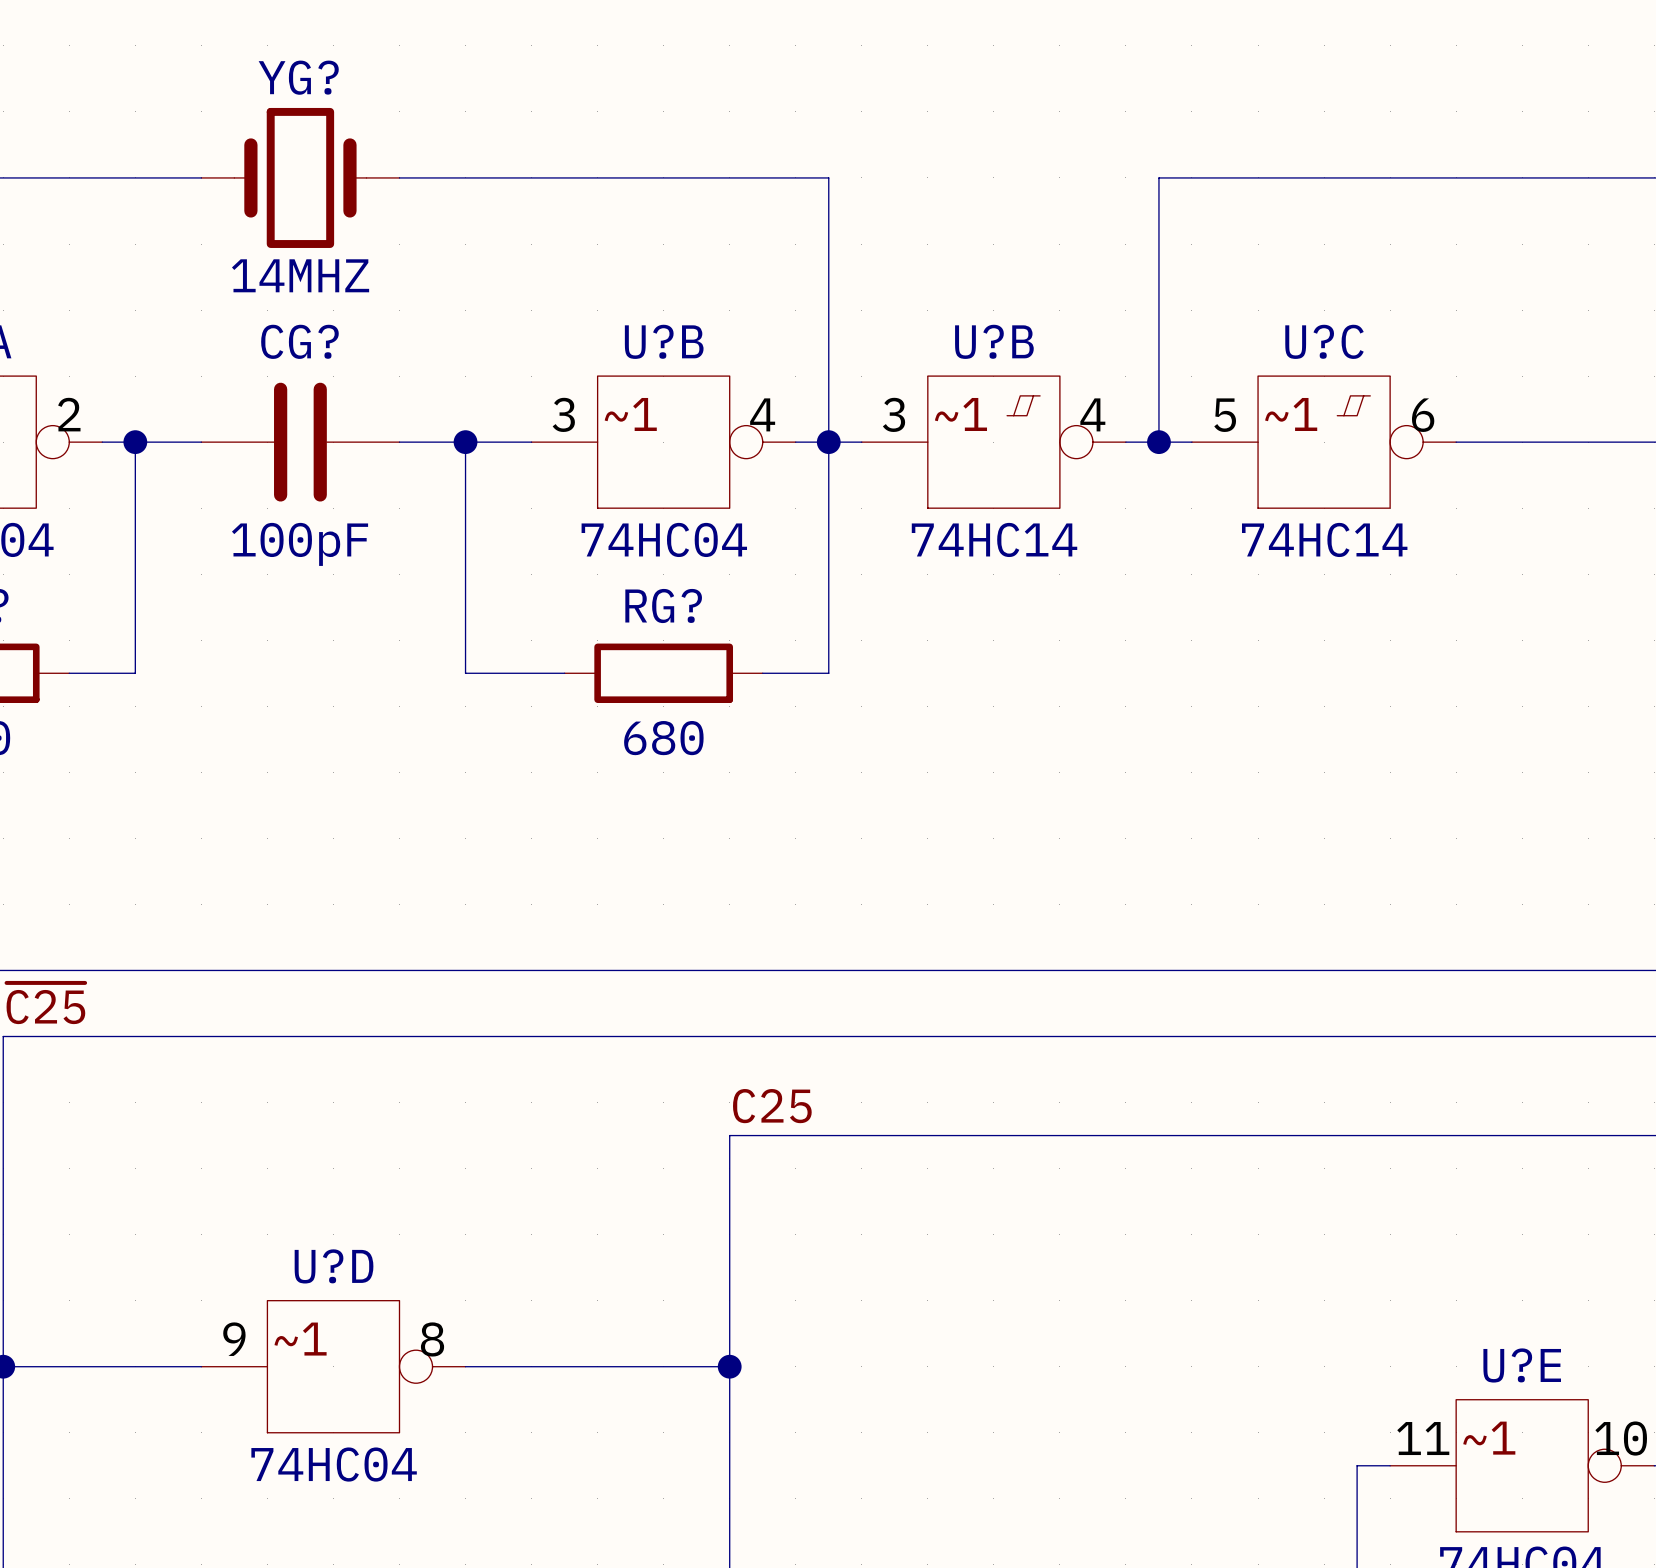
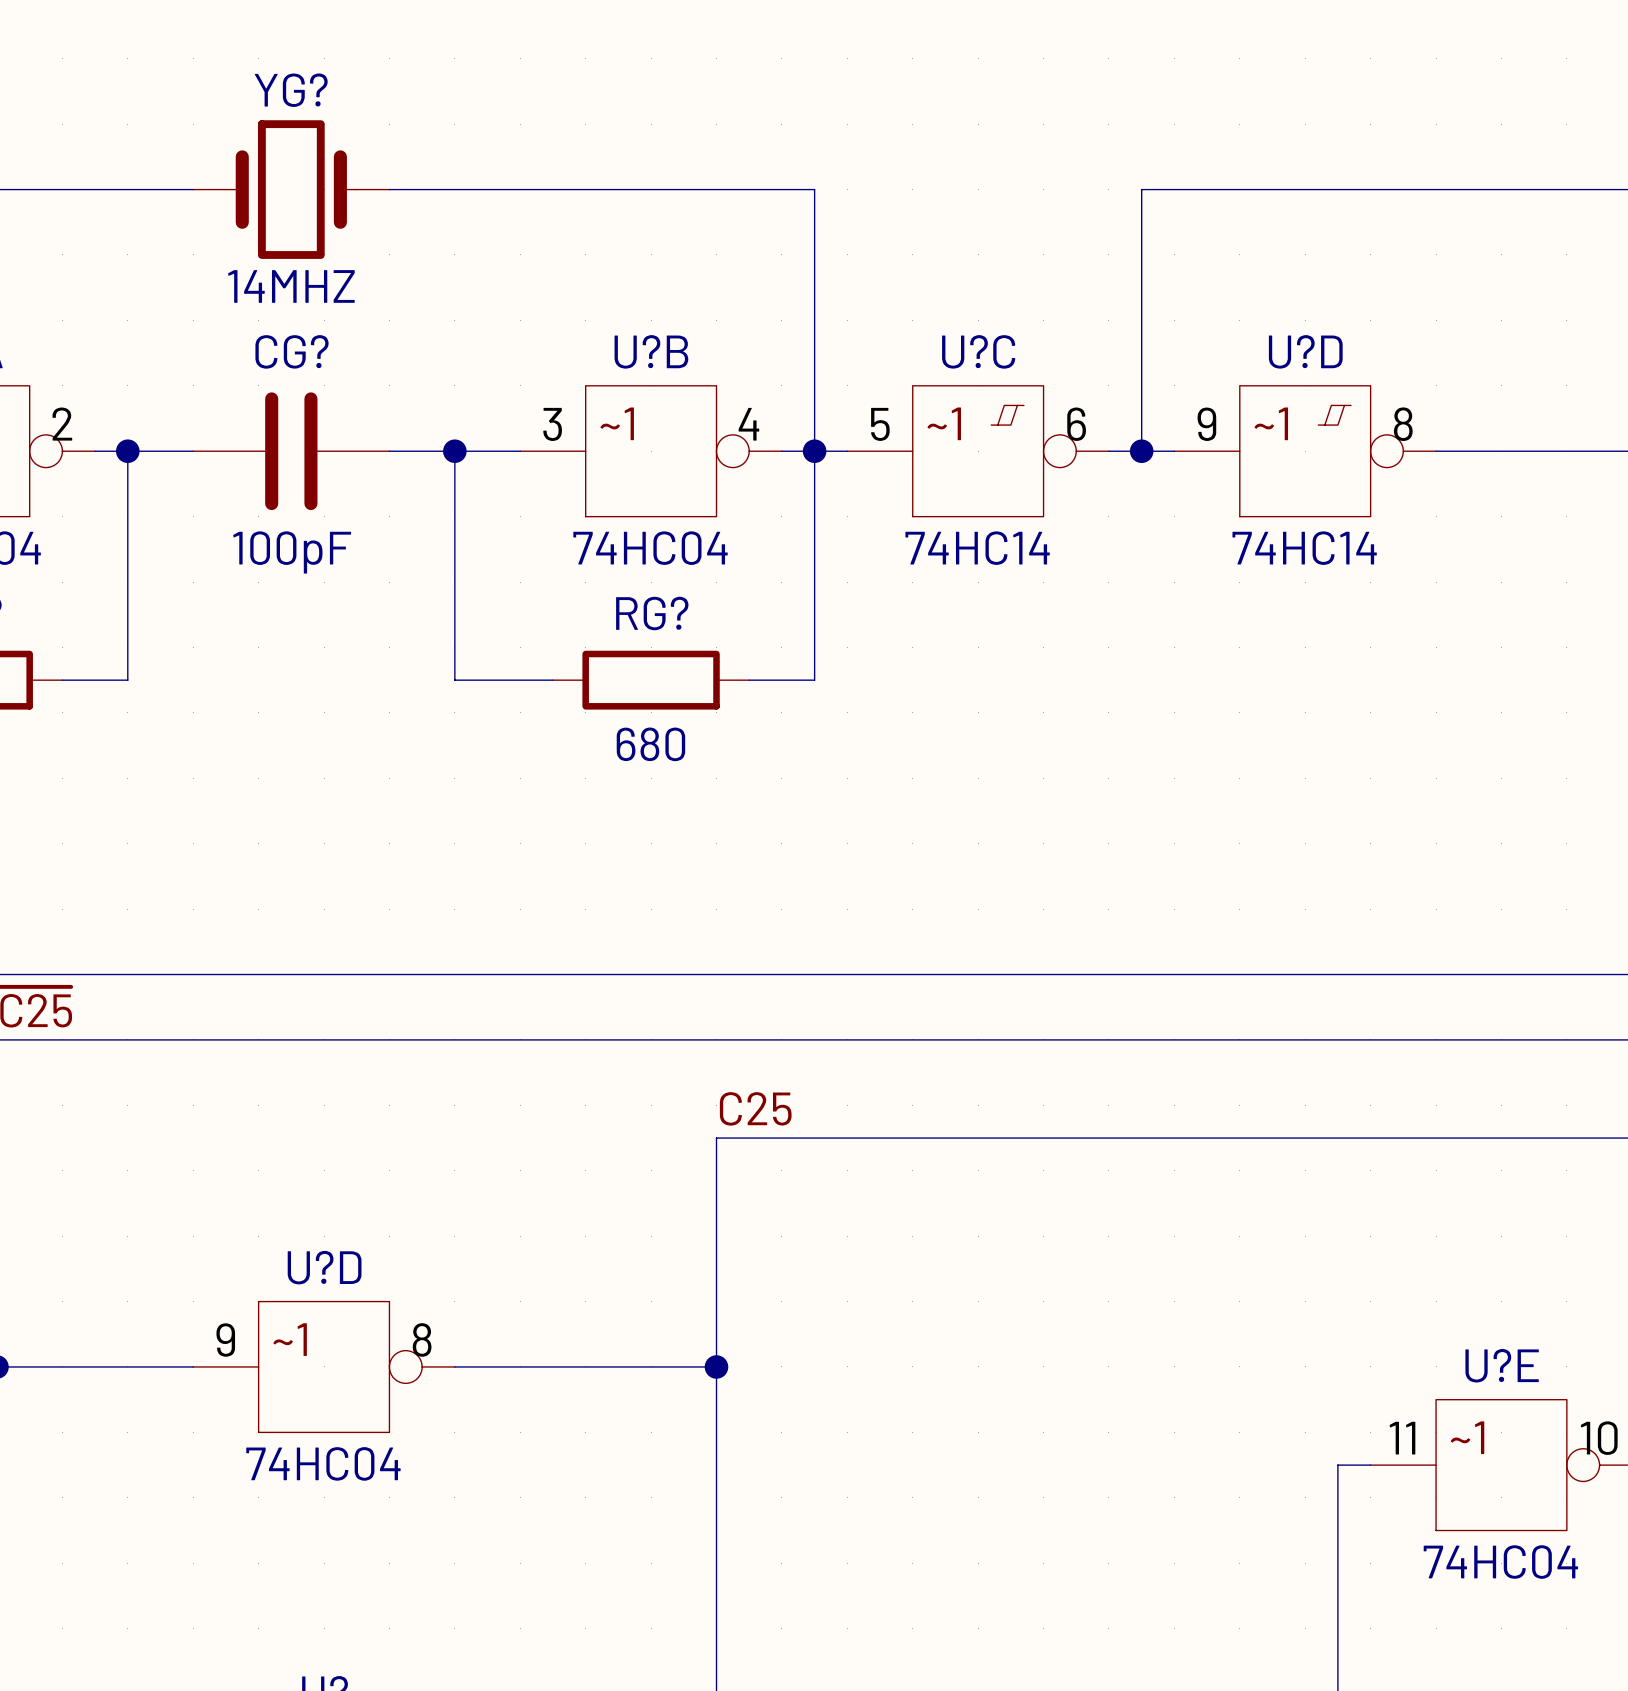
U?B name: U?B (994, 341) -> U?C (978, 351)
U?C name: U?C (1324, 341) -> U?D (1305, 351)
U?B pin number: 3 (894, 414) -> 5 (880, 424)
U?B pin number: 4 (1092, 414) -> 6 (1076, 424)
U?C pin number: 5 (1225, 415) -> 9 (1206, 424)
U?C pin number: 6 (1423, 415) -> 8 (1403, 424)

